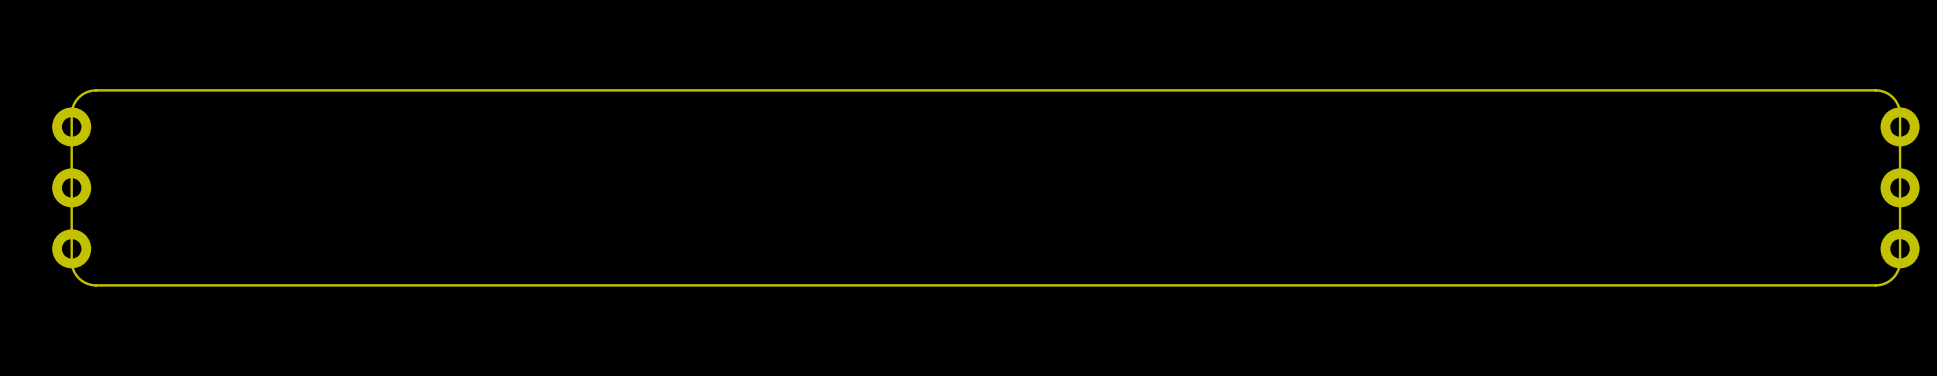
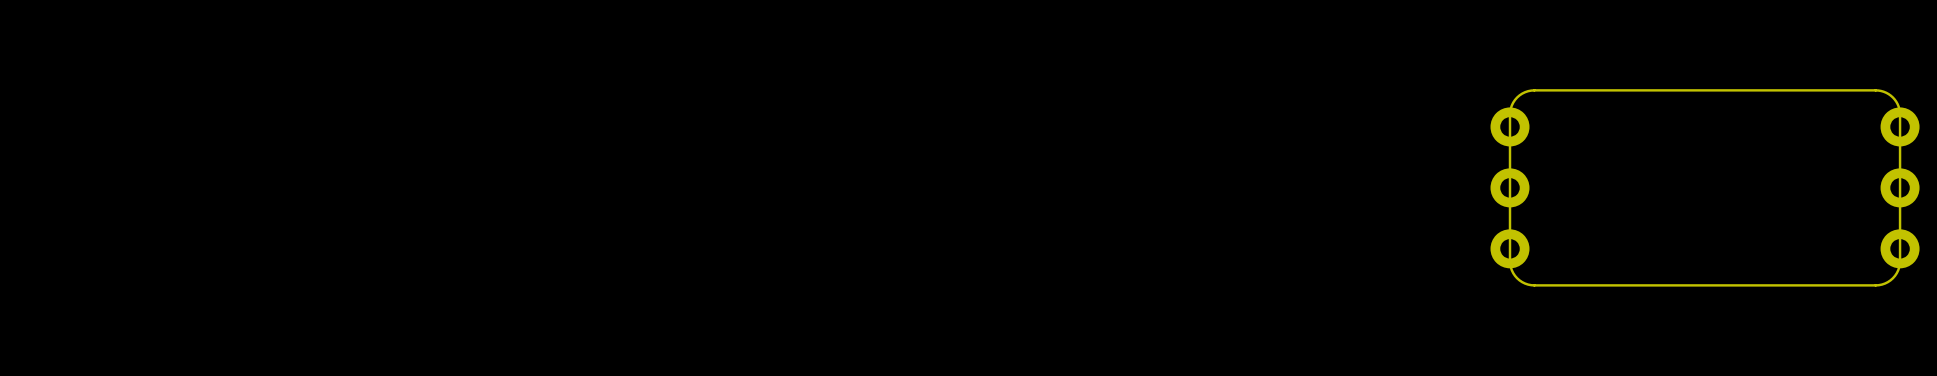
board edge: (1534, 90) (96, 90) (86, 92) (78, 97) (73, 105) (71, 114) (71, 264) (78, 278) (92, 285) (1534, 285) -> (1534, 90) (1525, 92) (1517, 97) (1511, 105) (1510, 114) (1510, 264) (1513, 273) (1519, 280) (1534, 285)
part: (71, 187) -> none
part: none -> (1510, 187)

